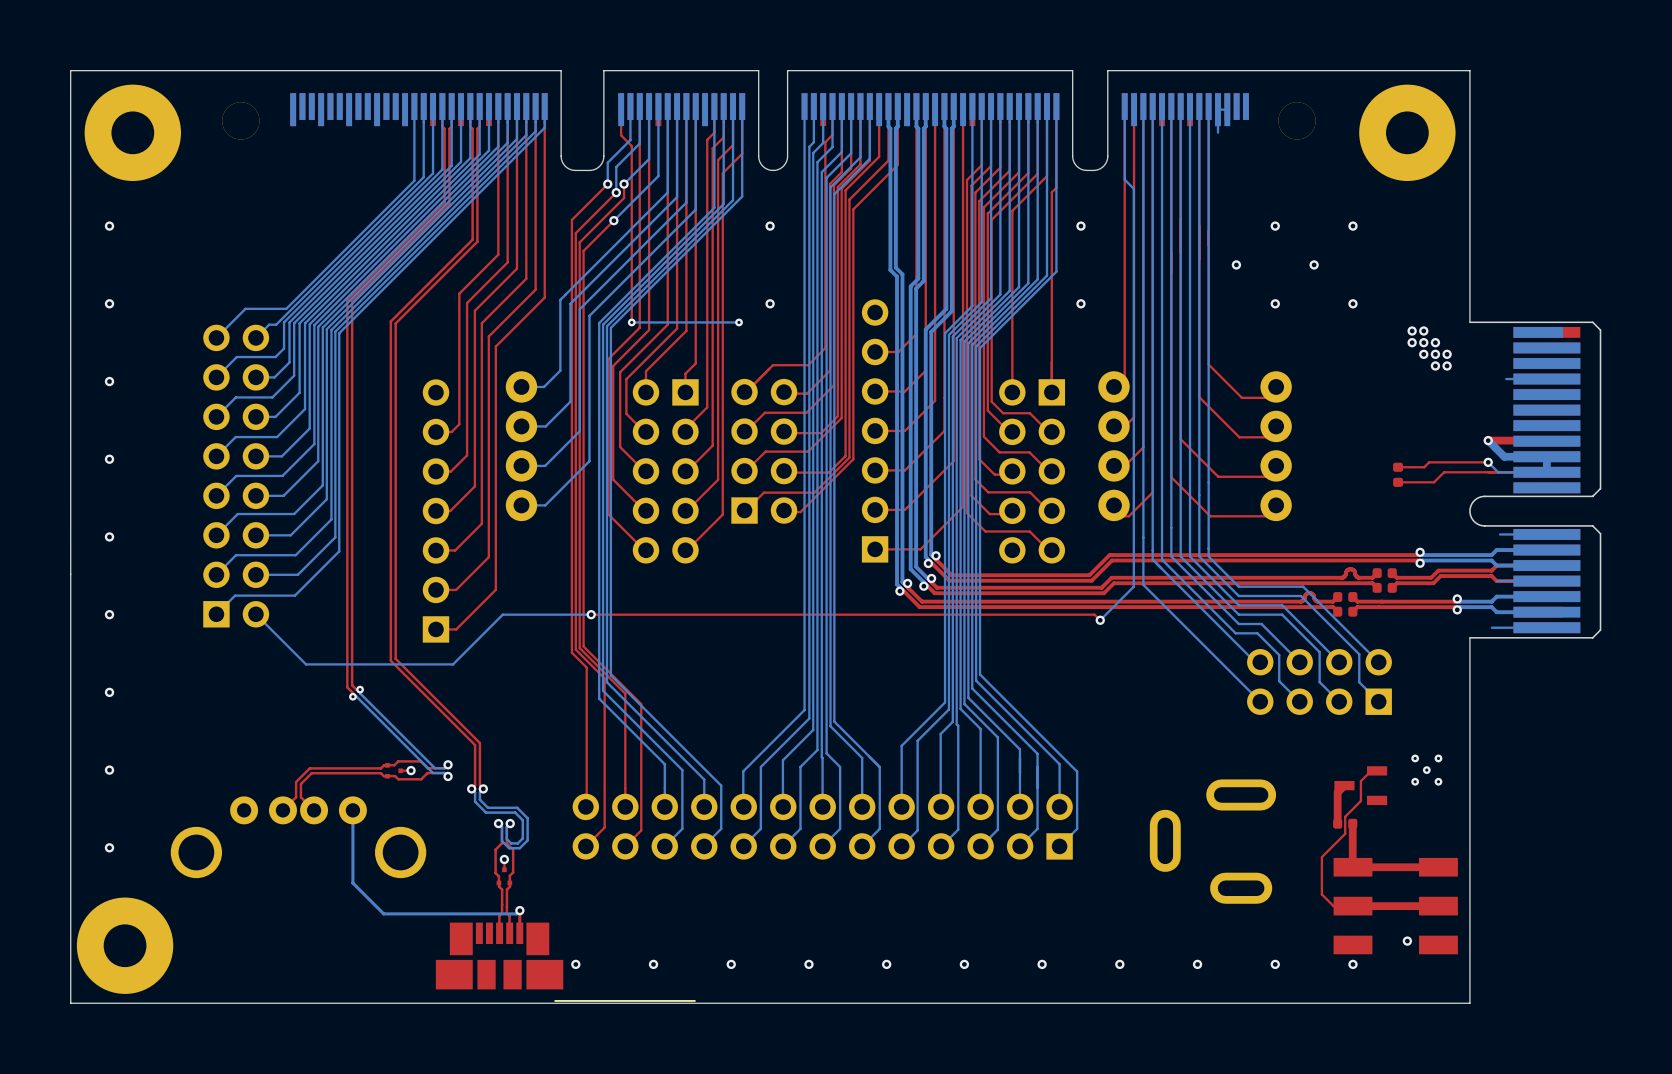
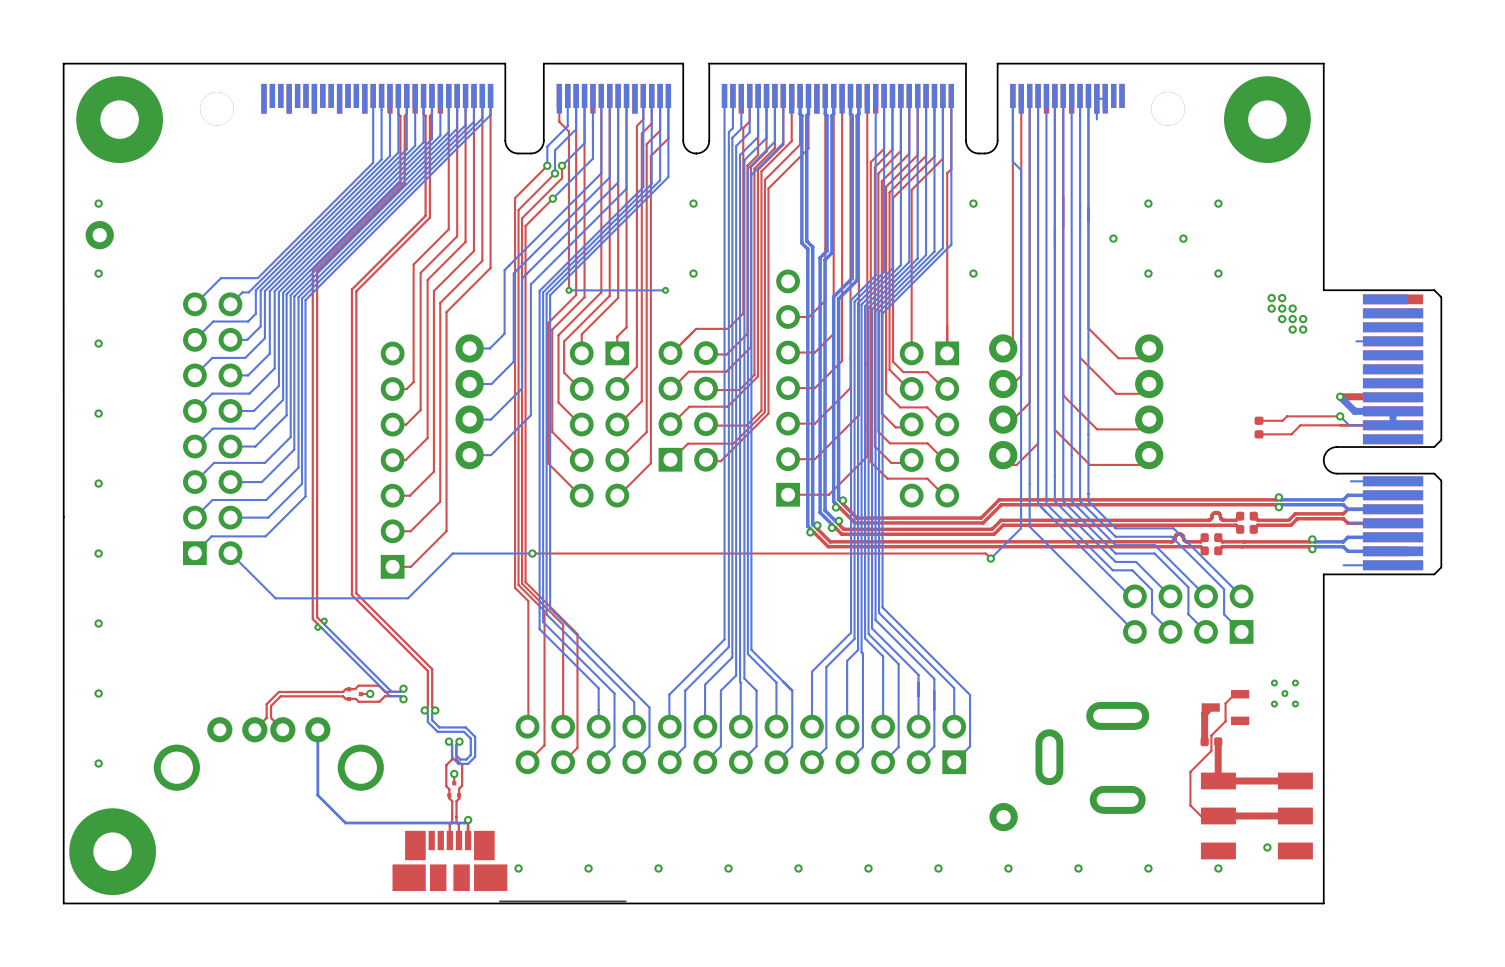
part: none -> (99, 235)
part: none -> (1003, 817)

